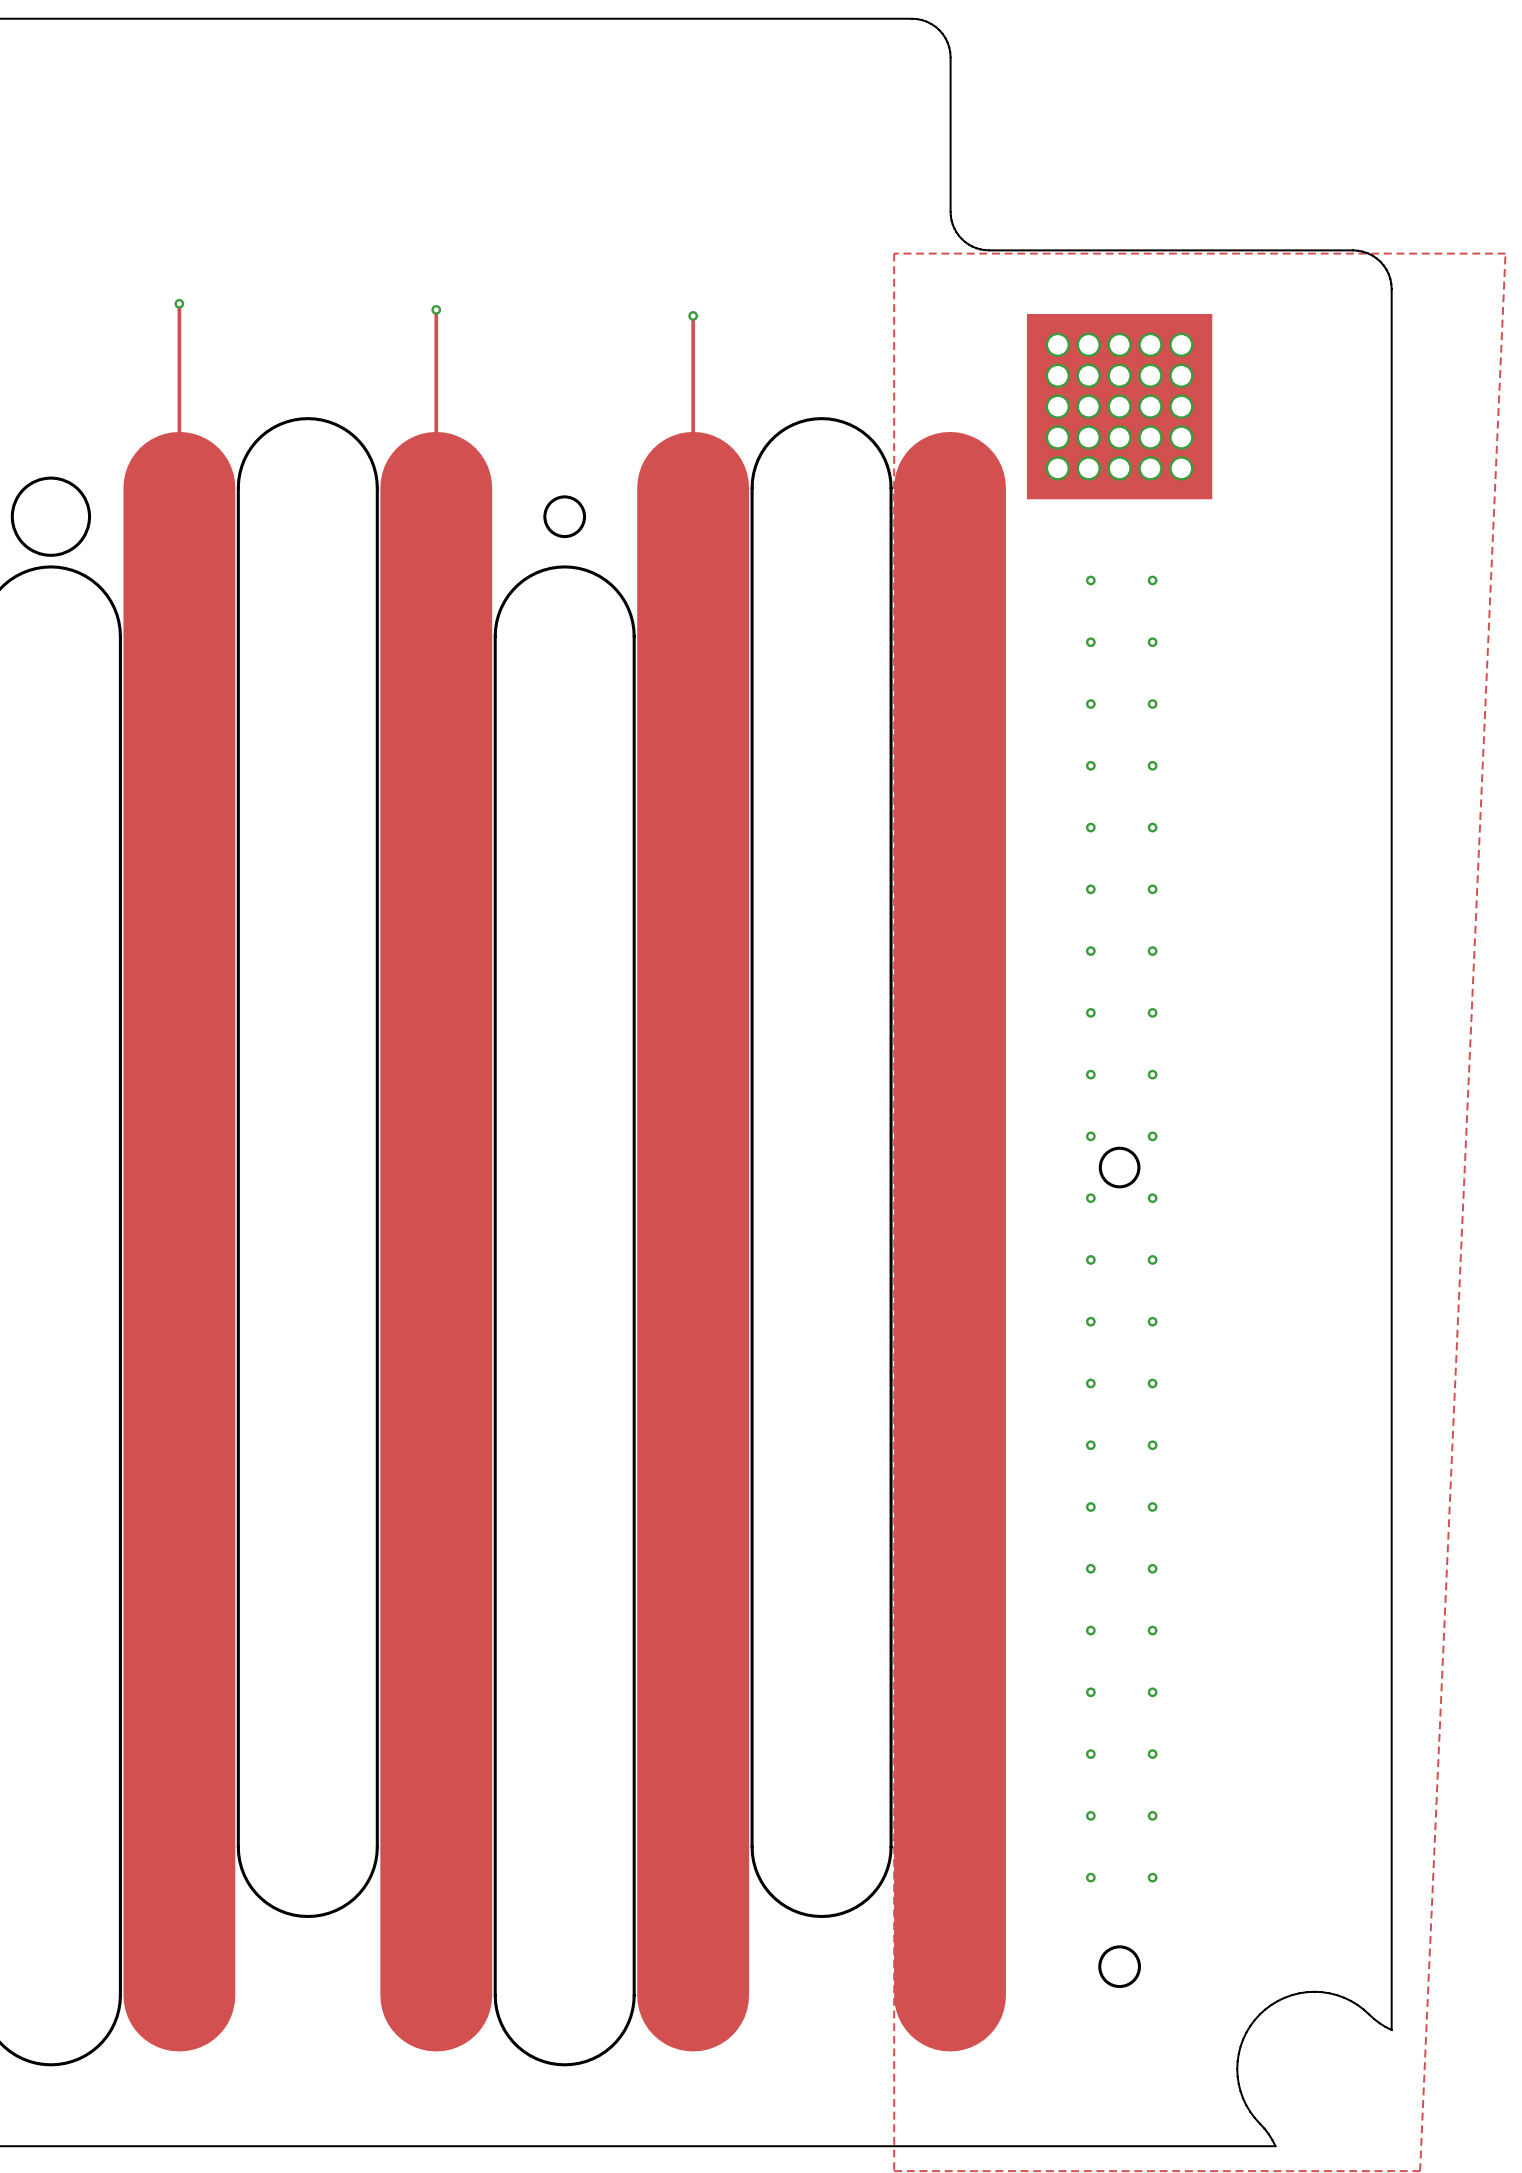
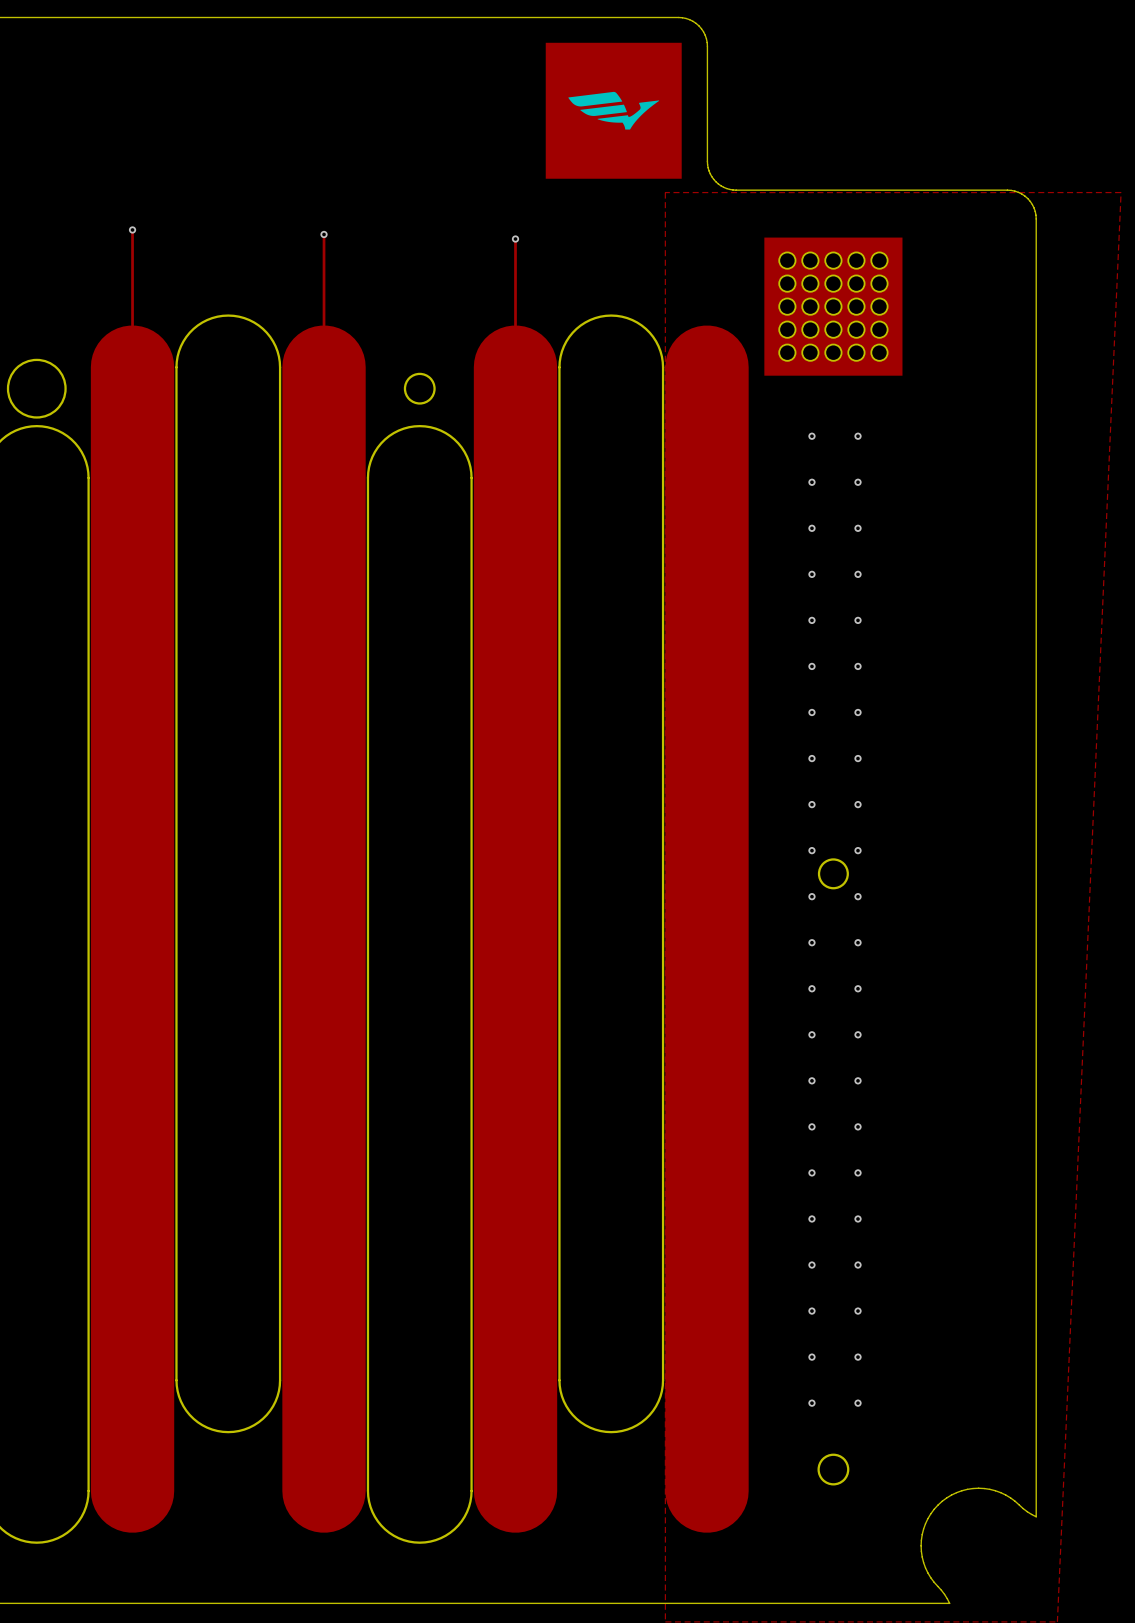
drawing: none -> [545, 42, 682, 179]

